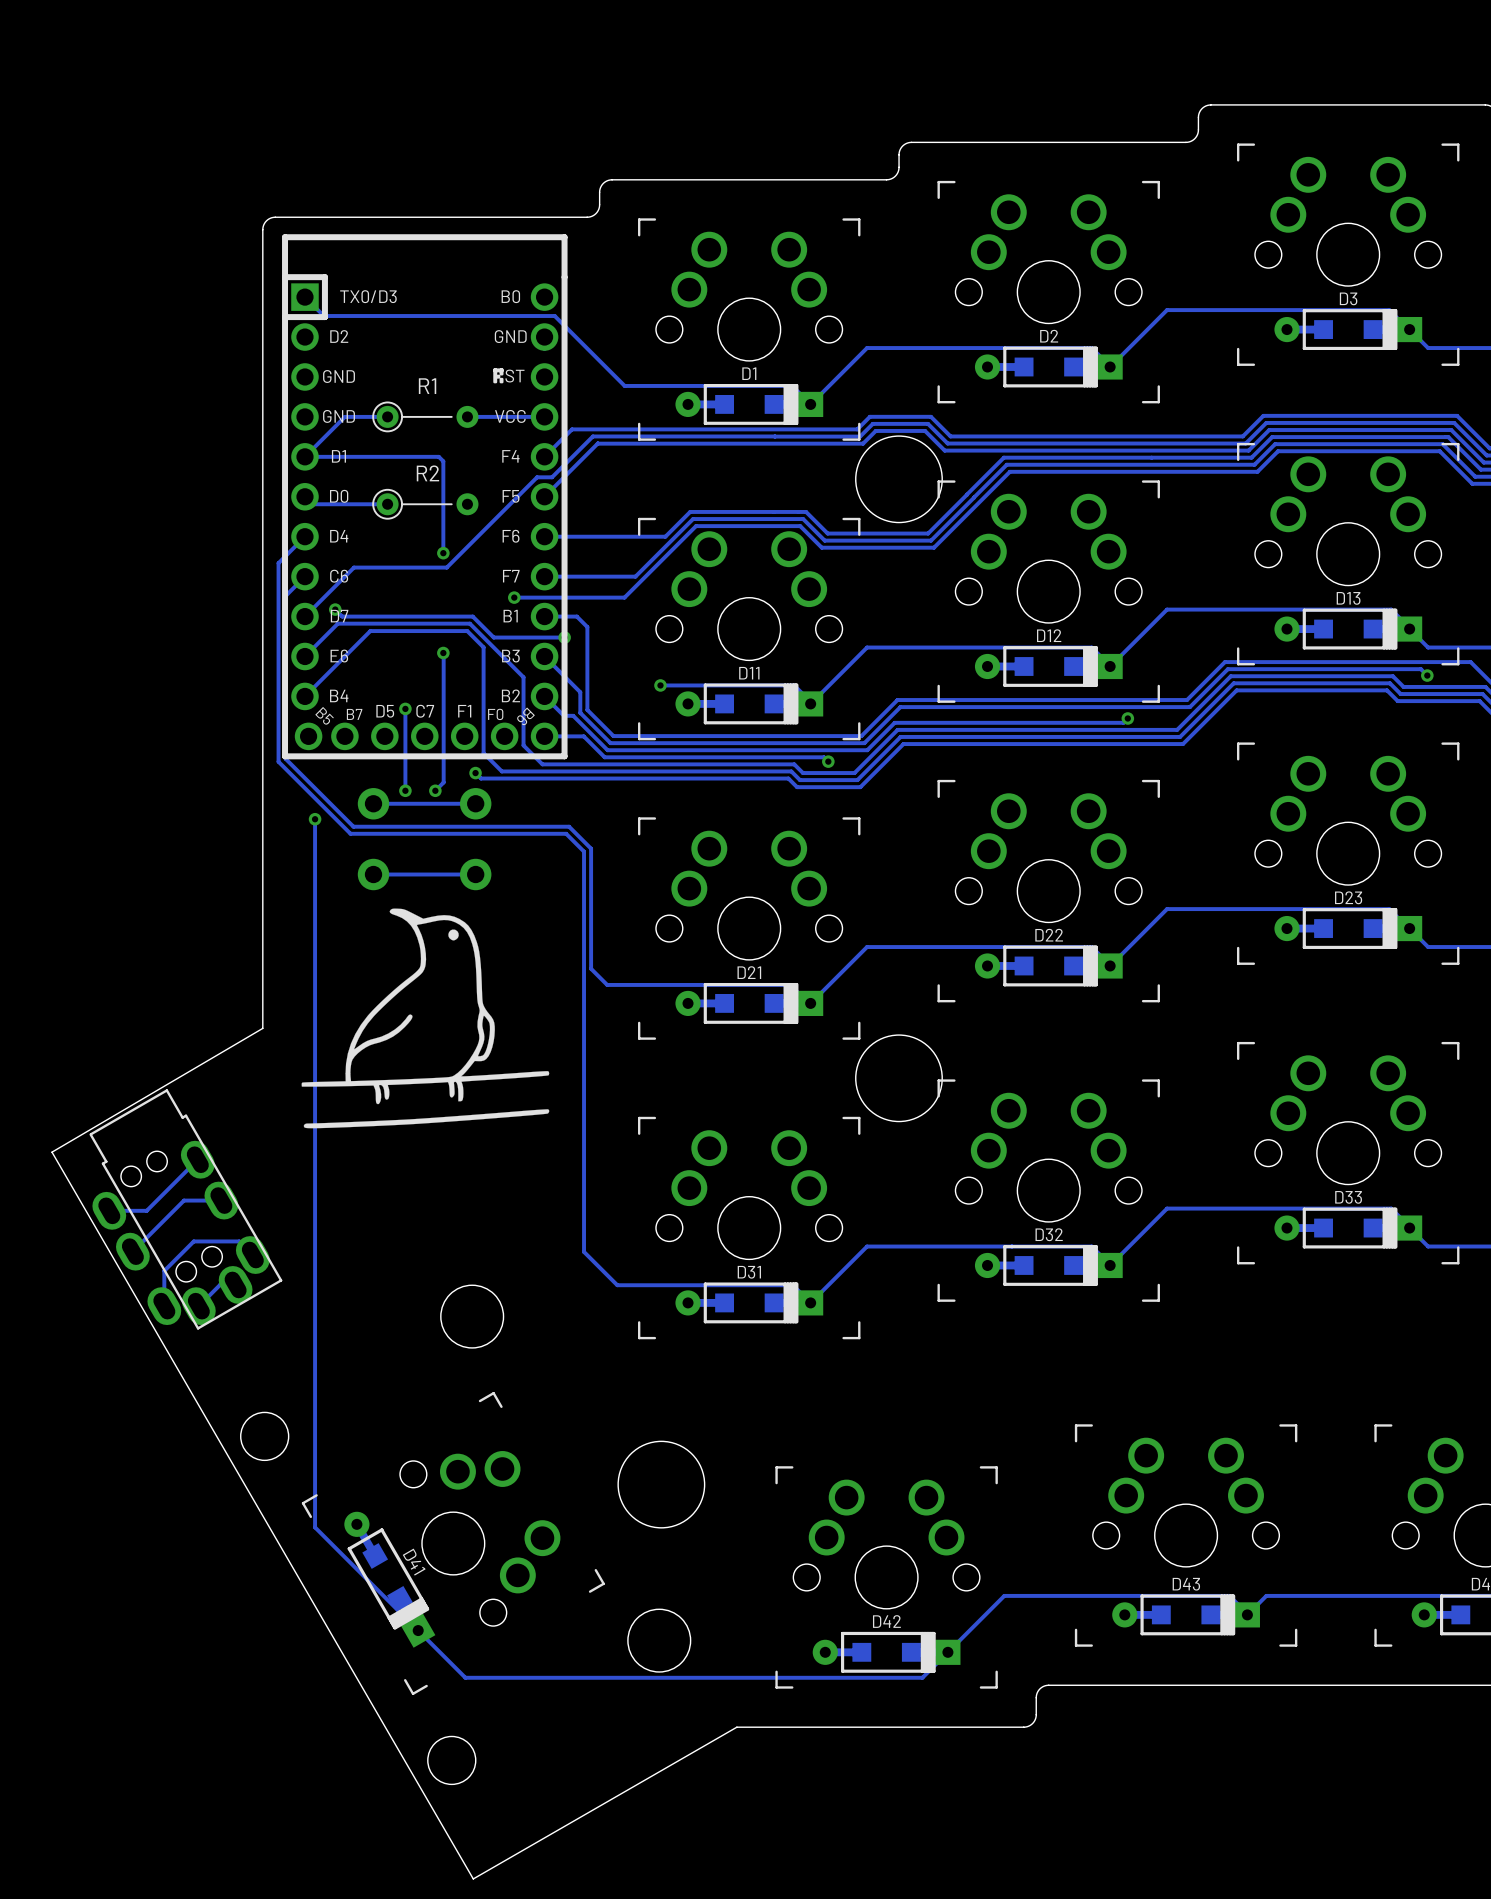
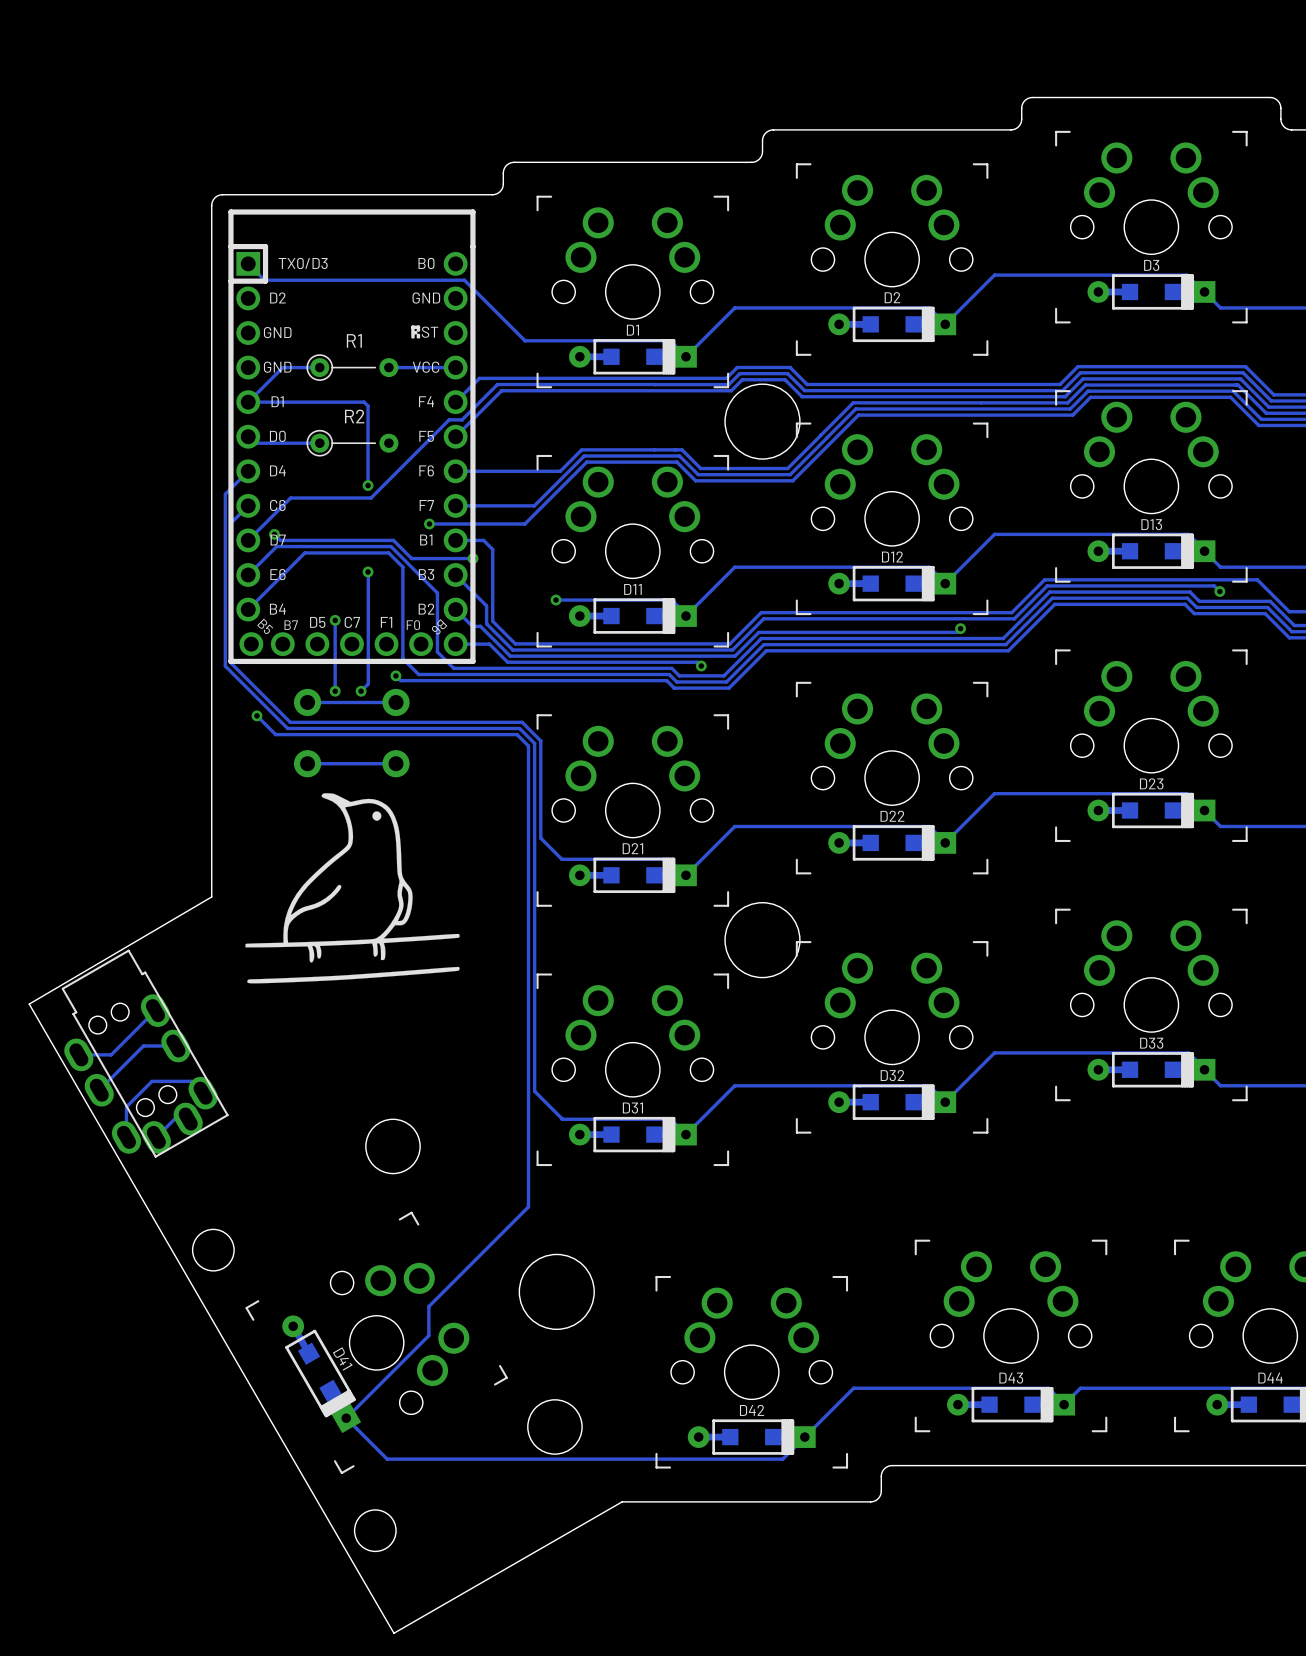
track: (315, 819) (315, 1527) (418, 1630) -> (256, 715) (275, 734) (517, 734) (528, 746) (528, 1206) (428, 1306) (428, 1335) (346, 1418)
track: (569, 826) (591, 848) (591, 968) (607, 984) (667, 984) -> (476, 722) (522, 722) (540, 740) (540, 838) (561, 859)
track: (566, 833) (584, 851) (584, 1251) (617, 1285) (667, 1285) -> (474, 728) (519, 728) (534, 743) (534, 1091) (562, 1119)

